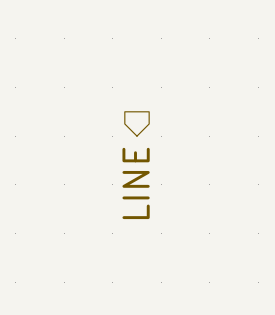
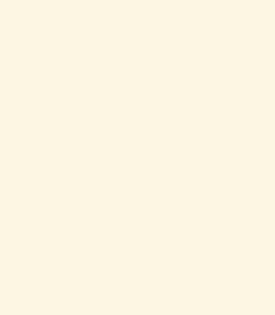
hierarchical label: LINE (136, 183) -> none

